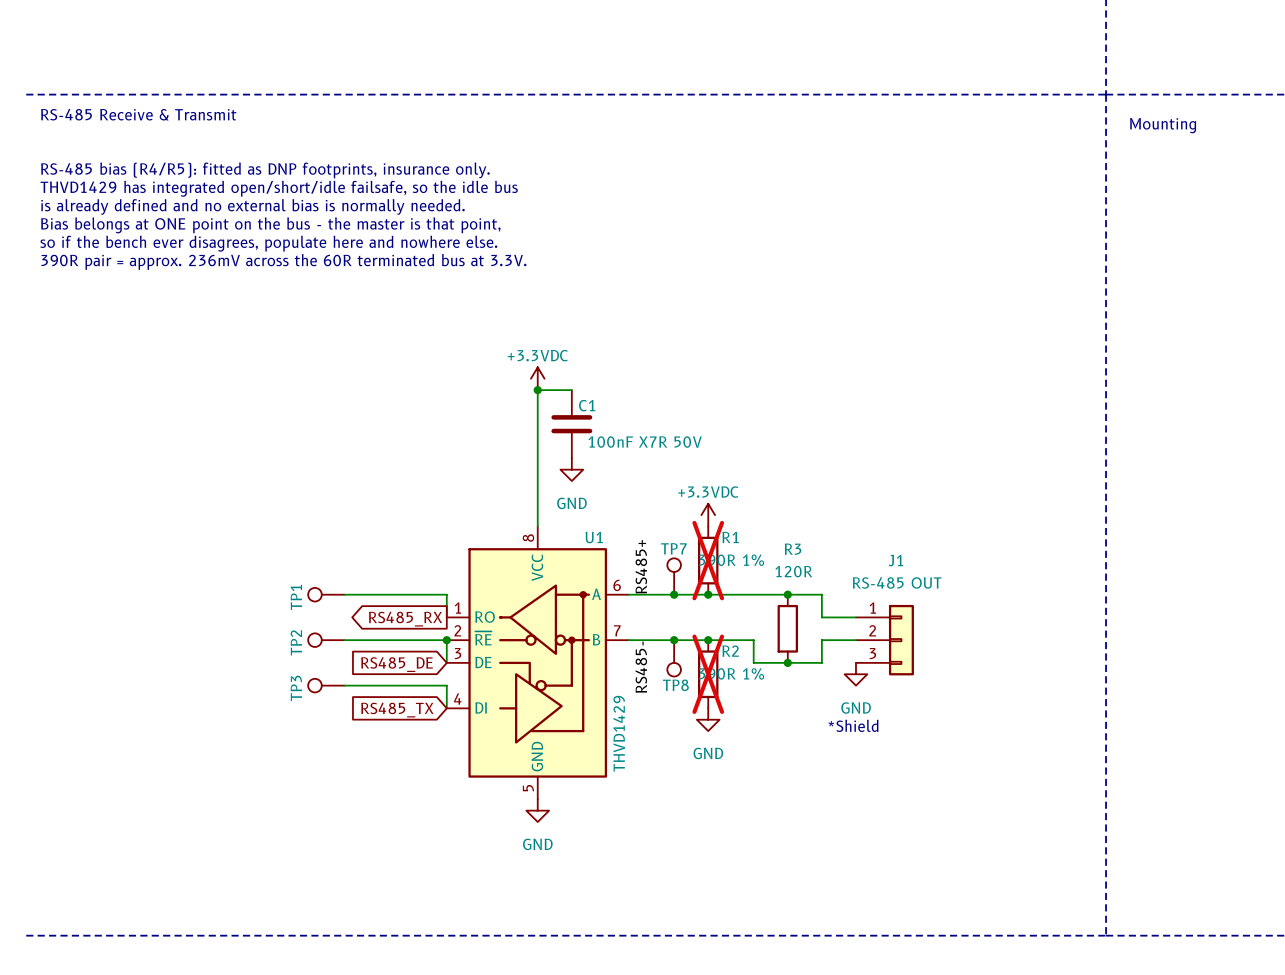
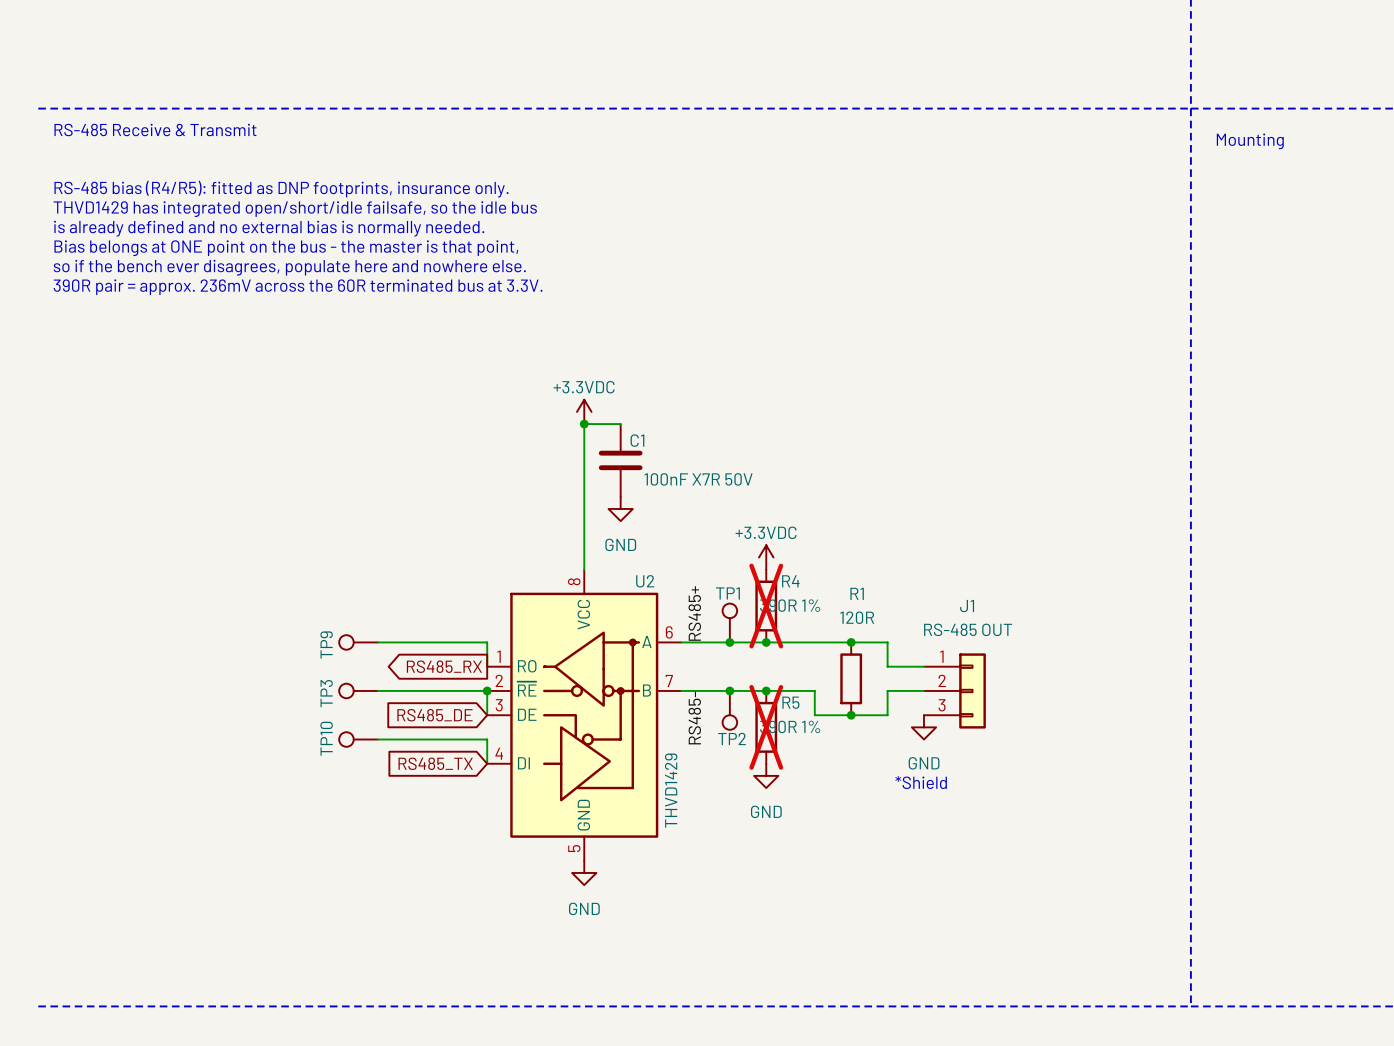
U1 name: U1 (594, 537) -> U2 (645, 581)
R1 name: R1 (730, 537) -> R4 (790, 581)
TP7 name: TP7 (673, 548) -> TP1 (727, 593)
R3 name: R3 (793, 549) -> R1 (857, 593)
TP1 name: TP1 (296, 597) -> TP9 (326, 645)
TP2 name: TP2 (296, 642) -> TP3 (326, 693)
R2 name: R2 (730, 651) -> R5 (790, 702)
TP8 name: TP8 (675, 685) -> TP2 (732, 738)
TP3 name: TP3 (296, 688) -> TP10 (326, 738)

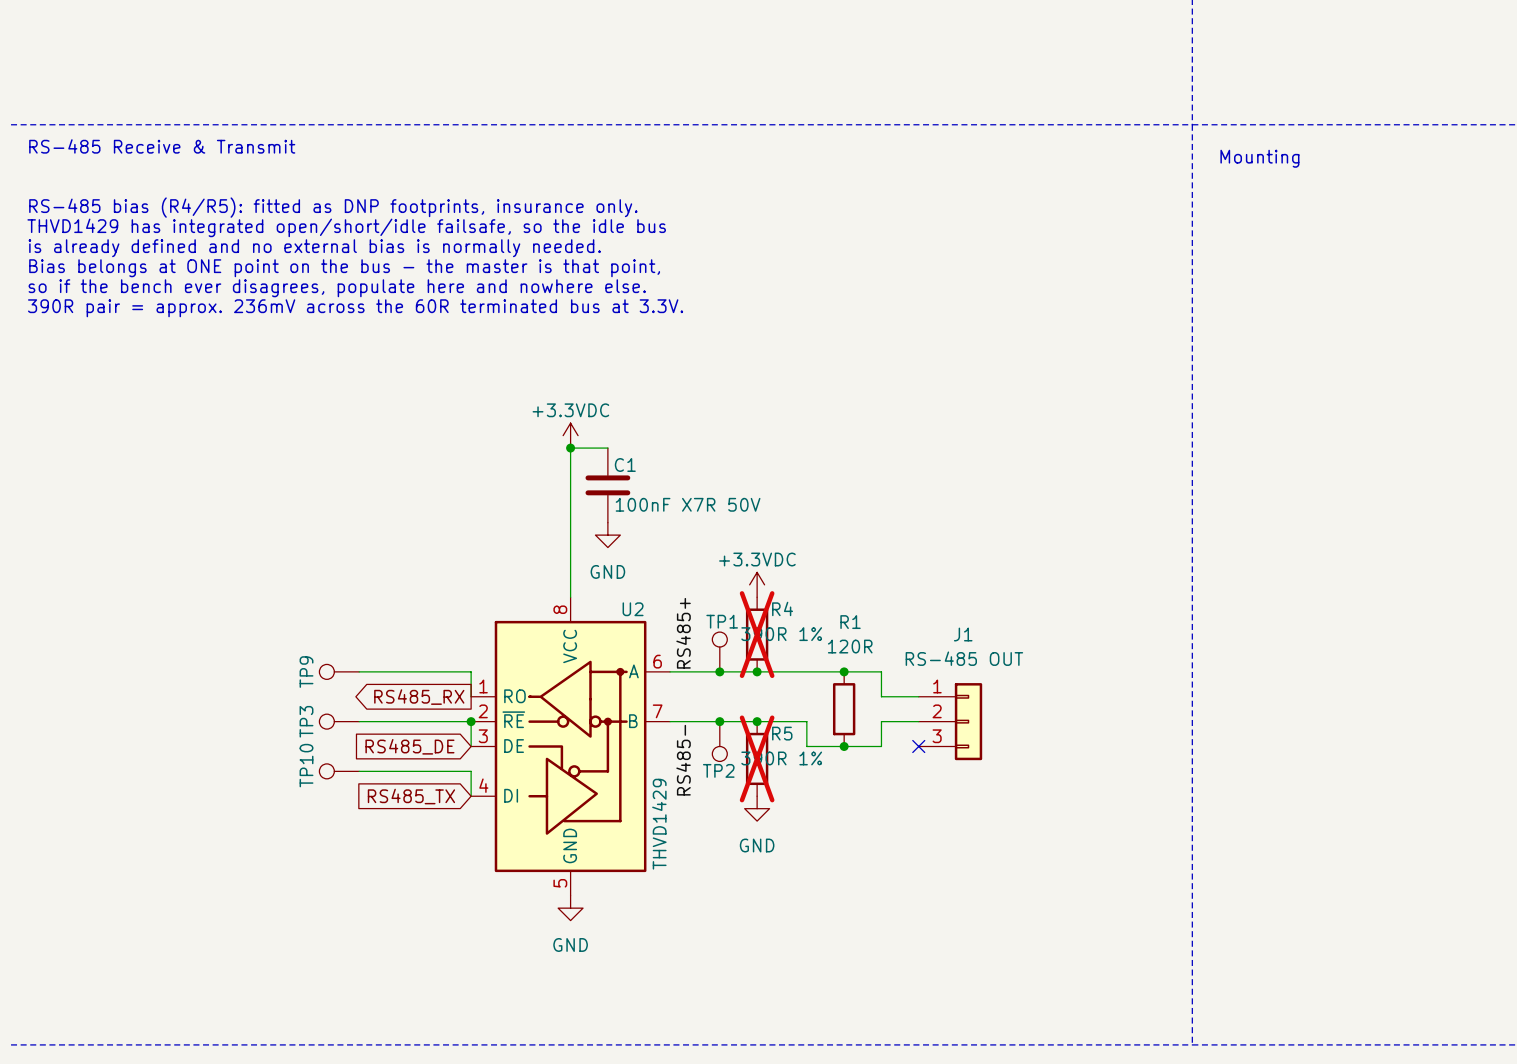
no-connect mark: none -> (918, 746)
power symbol: GND (923, 727) -> none
text: *Shield (921, 782) -> none

